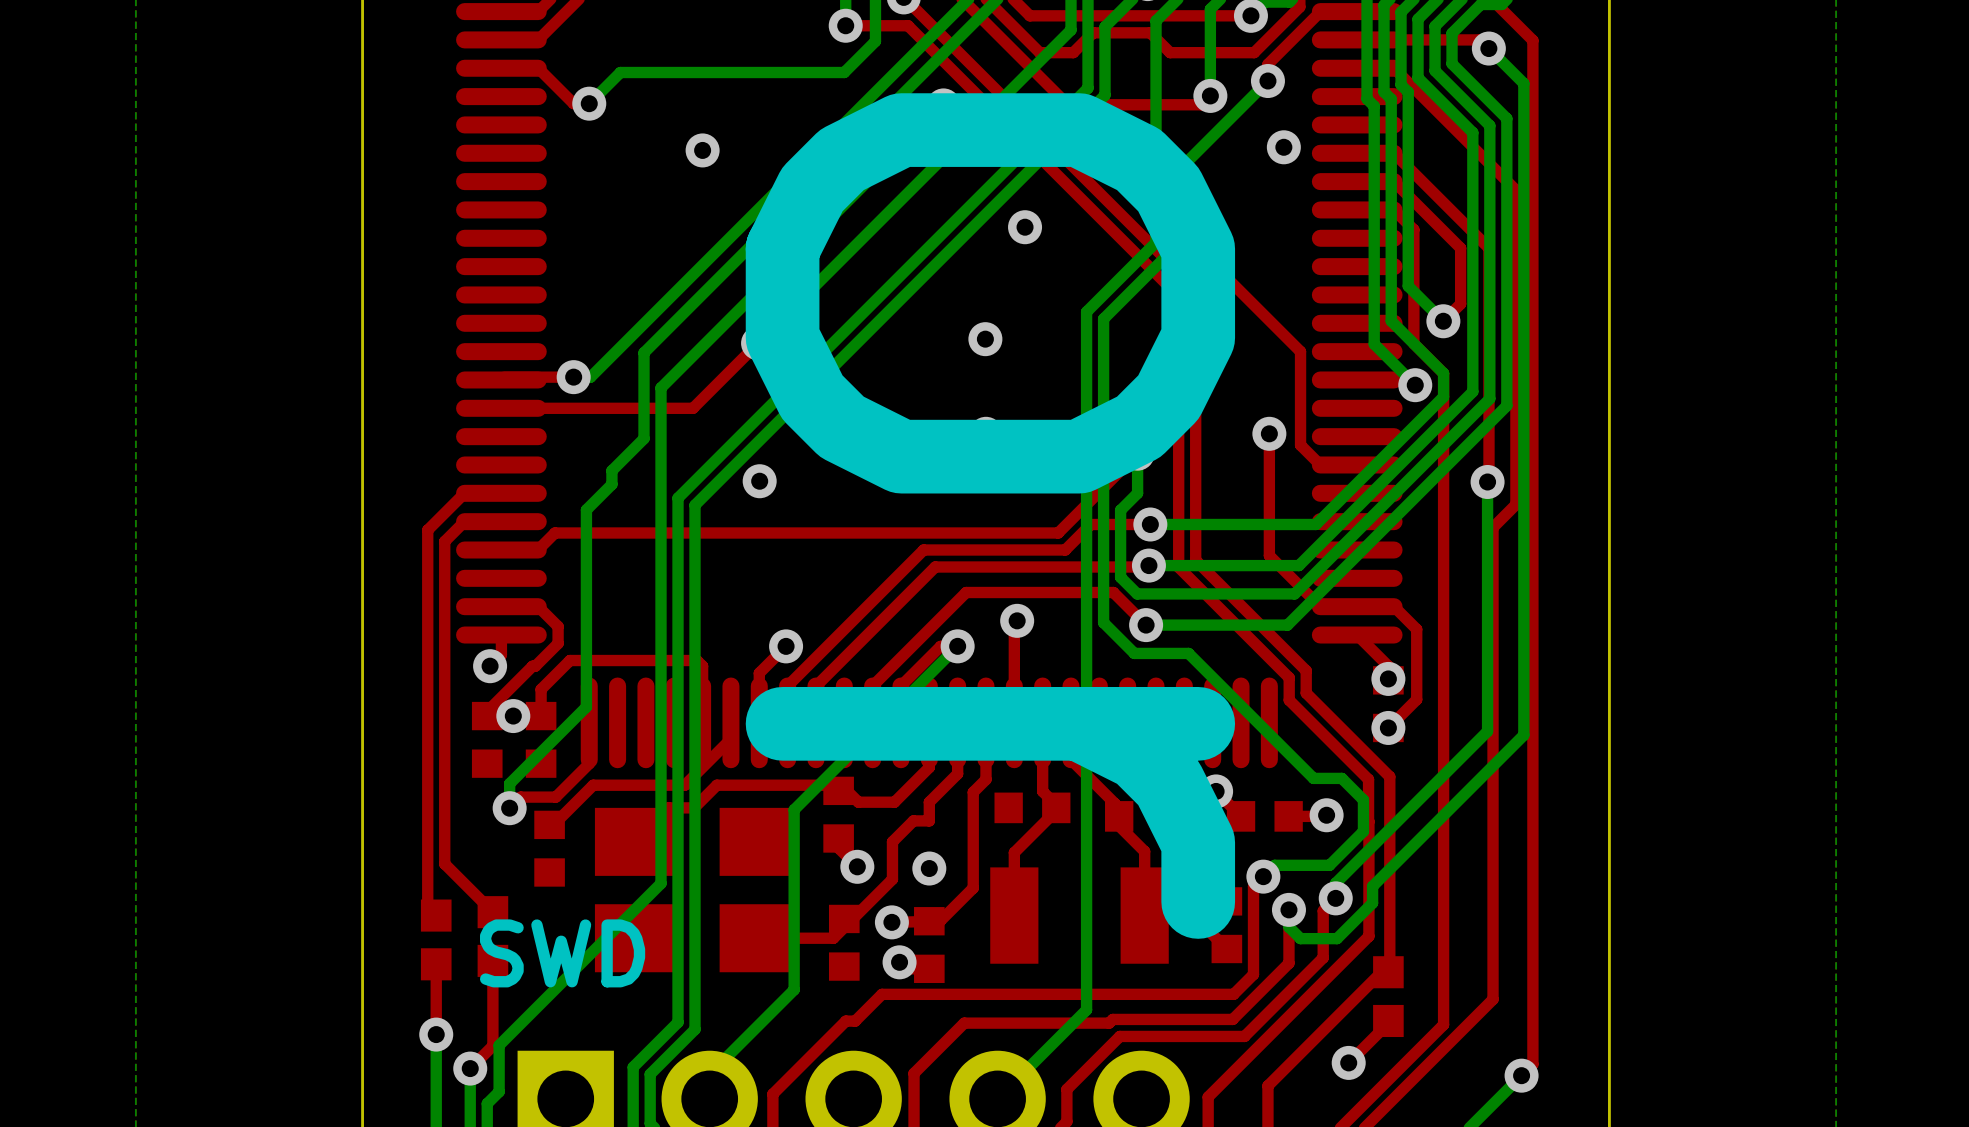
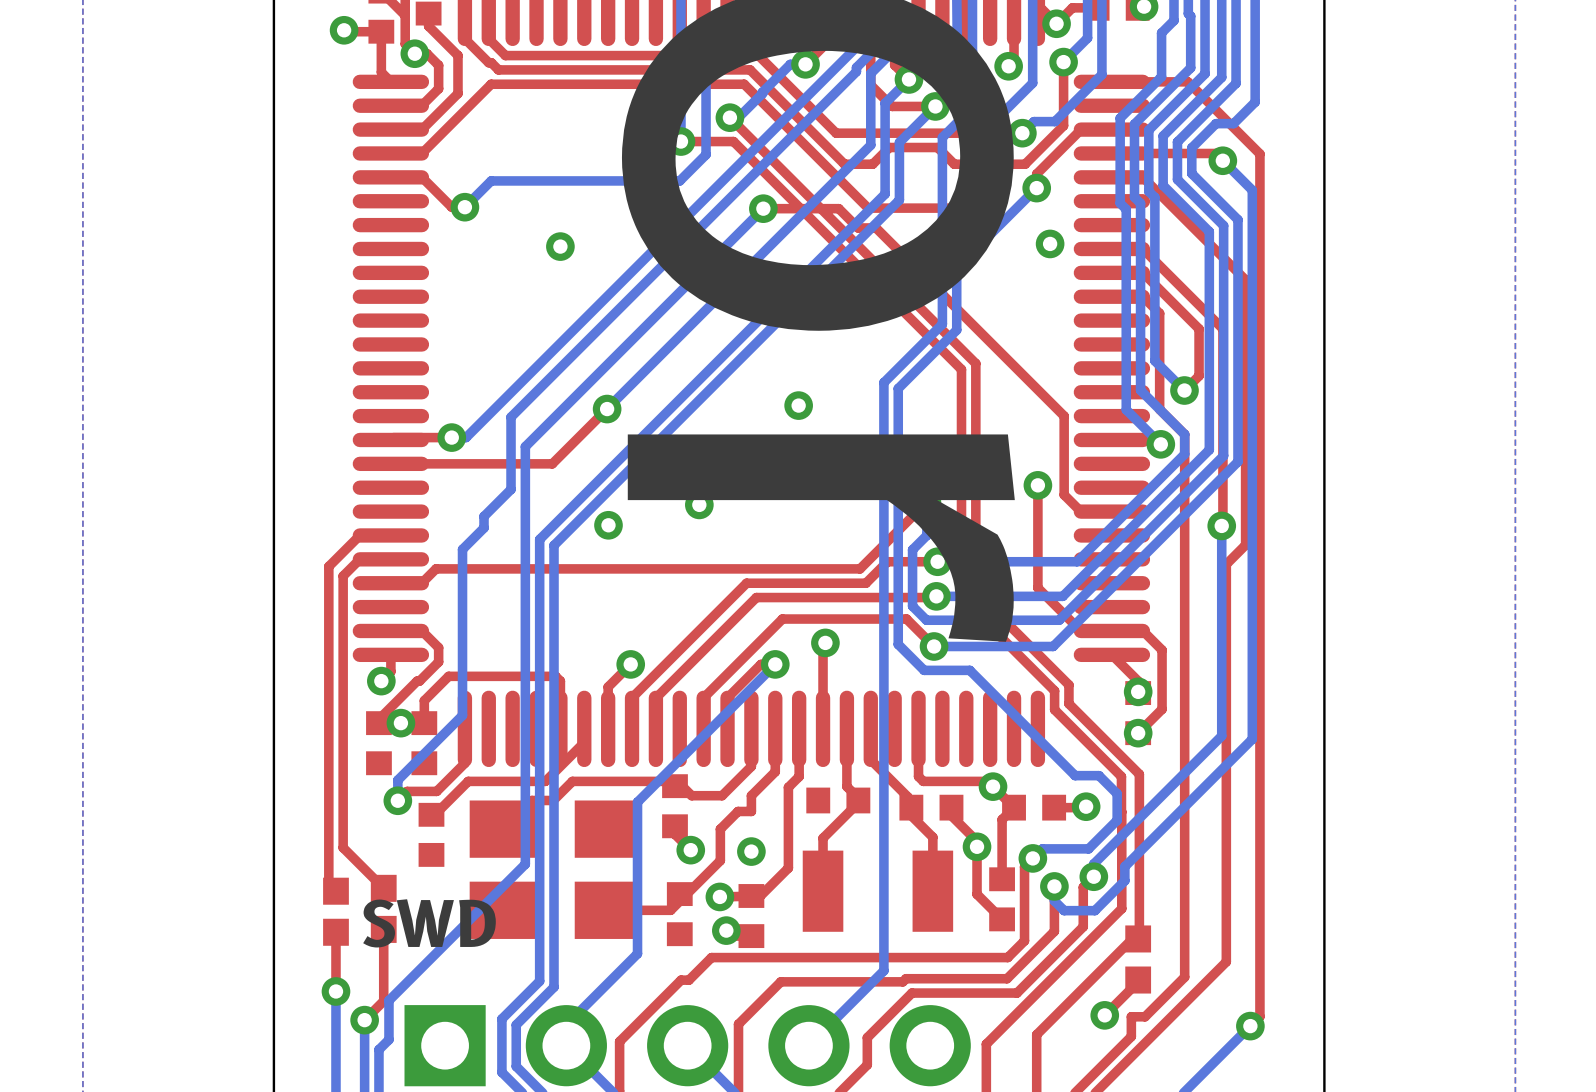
top track: (1443, 1017) (1443, 1024) (1380, 1088) -> (1184, 977) (1145, 1016) (1131, 1016) (1131, 1036)

